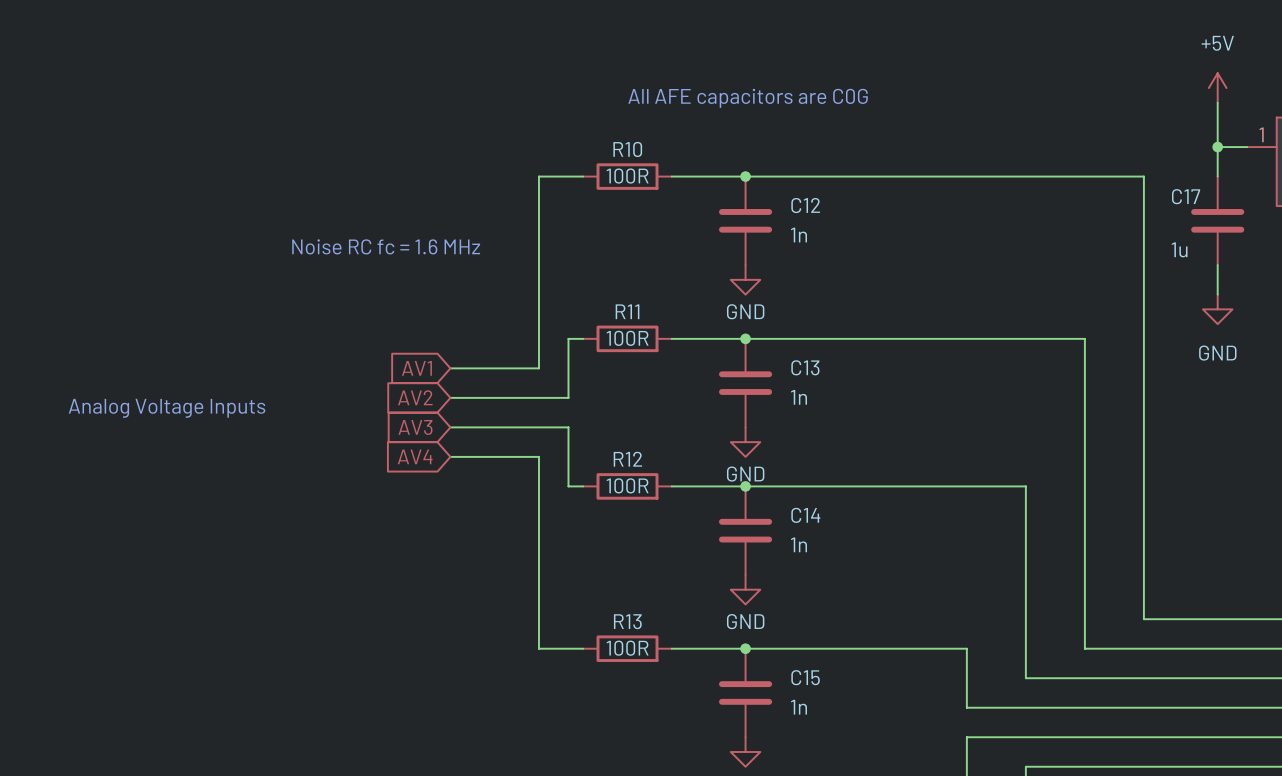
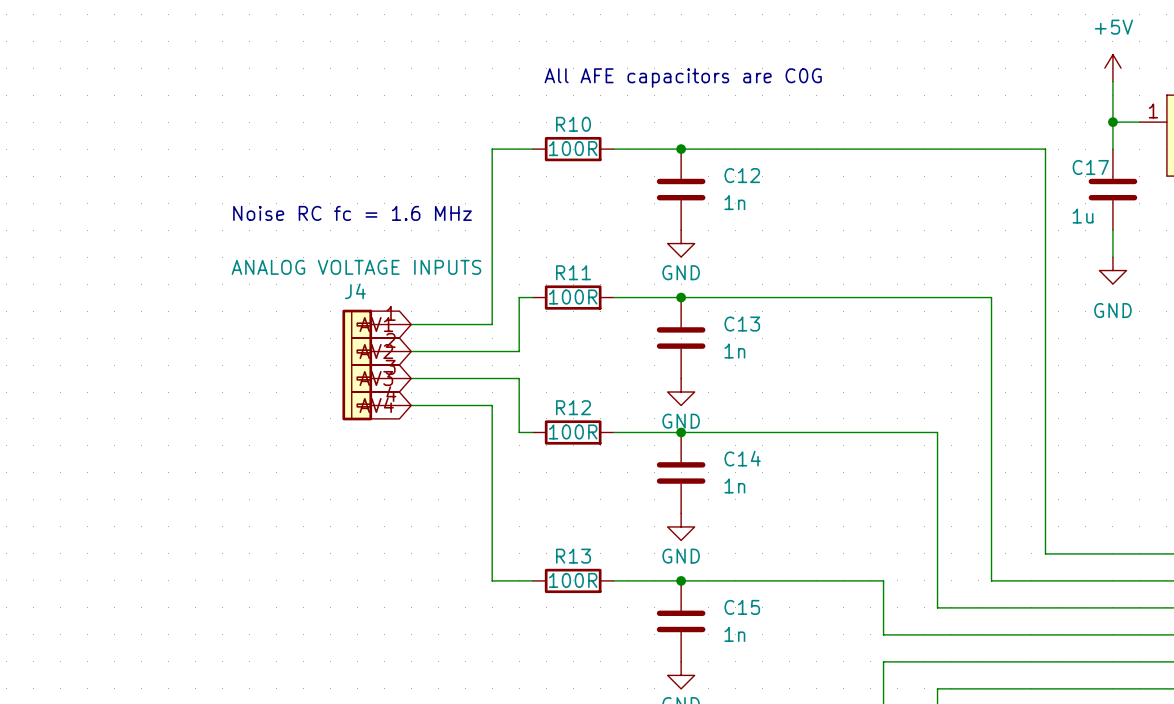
text: Analog Voltage Inputs (167, 408) -> none
J4: none -> ANALOG VOLTAGE INPUTS (376, 365)

